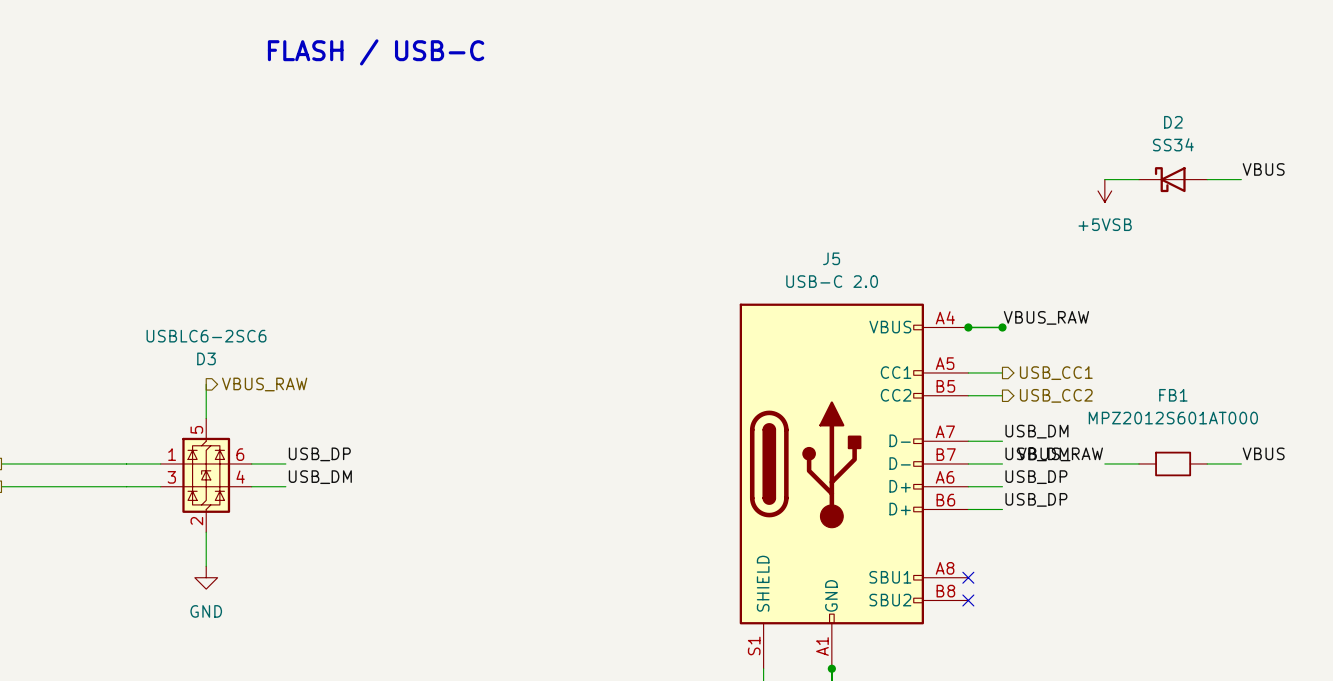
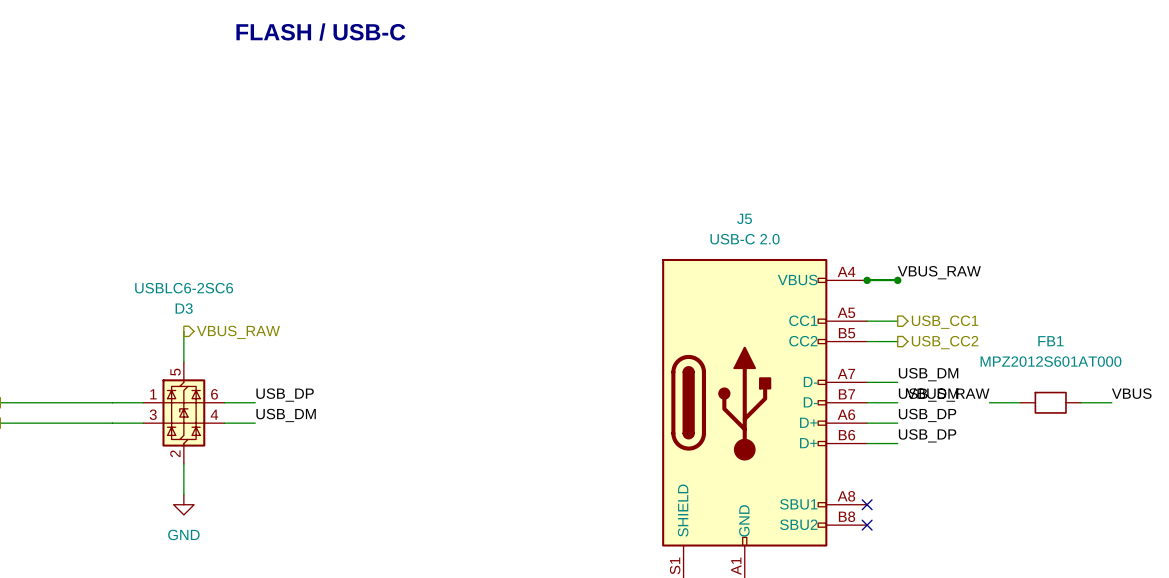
label: VBUS (1263, 169) -> none
wire: (1104, 179) (1138, 179) -> none
D2: SS34 (1173, 179) -> none
wire: (1207, 179) (1241, 179) -> none
power symbol: +5VSB (1104, 190) -> none

